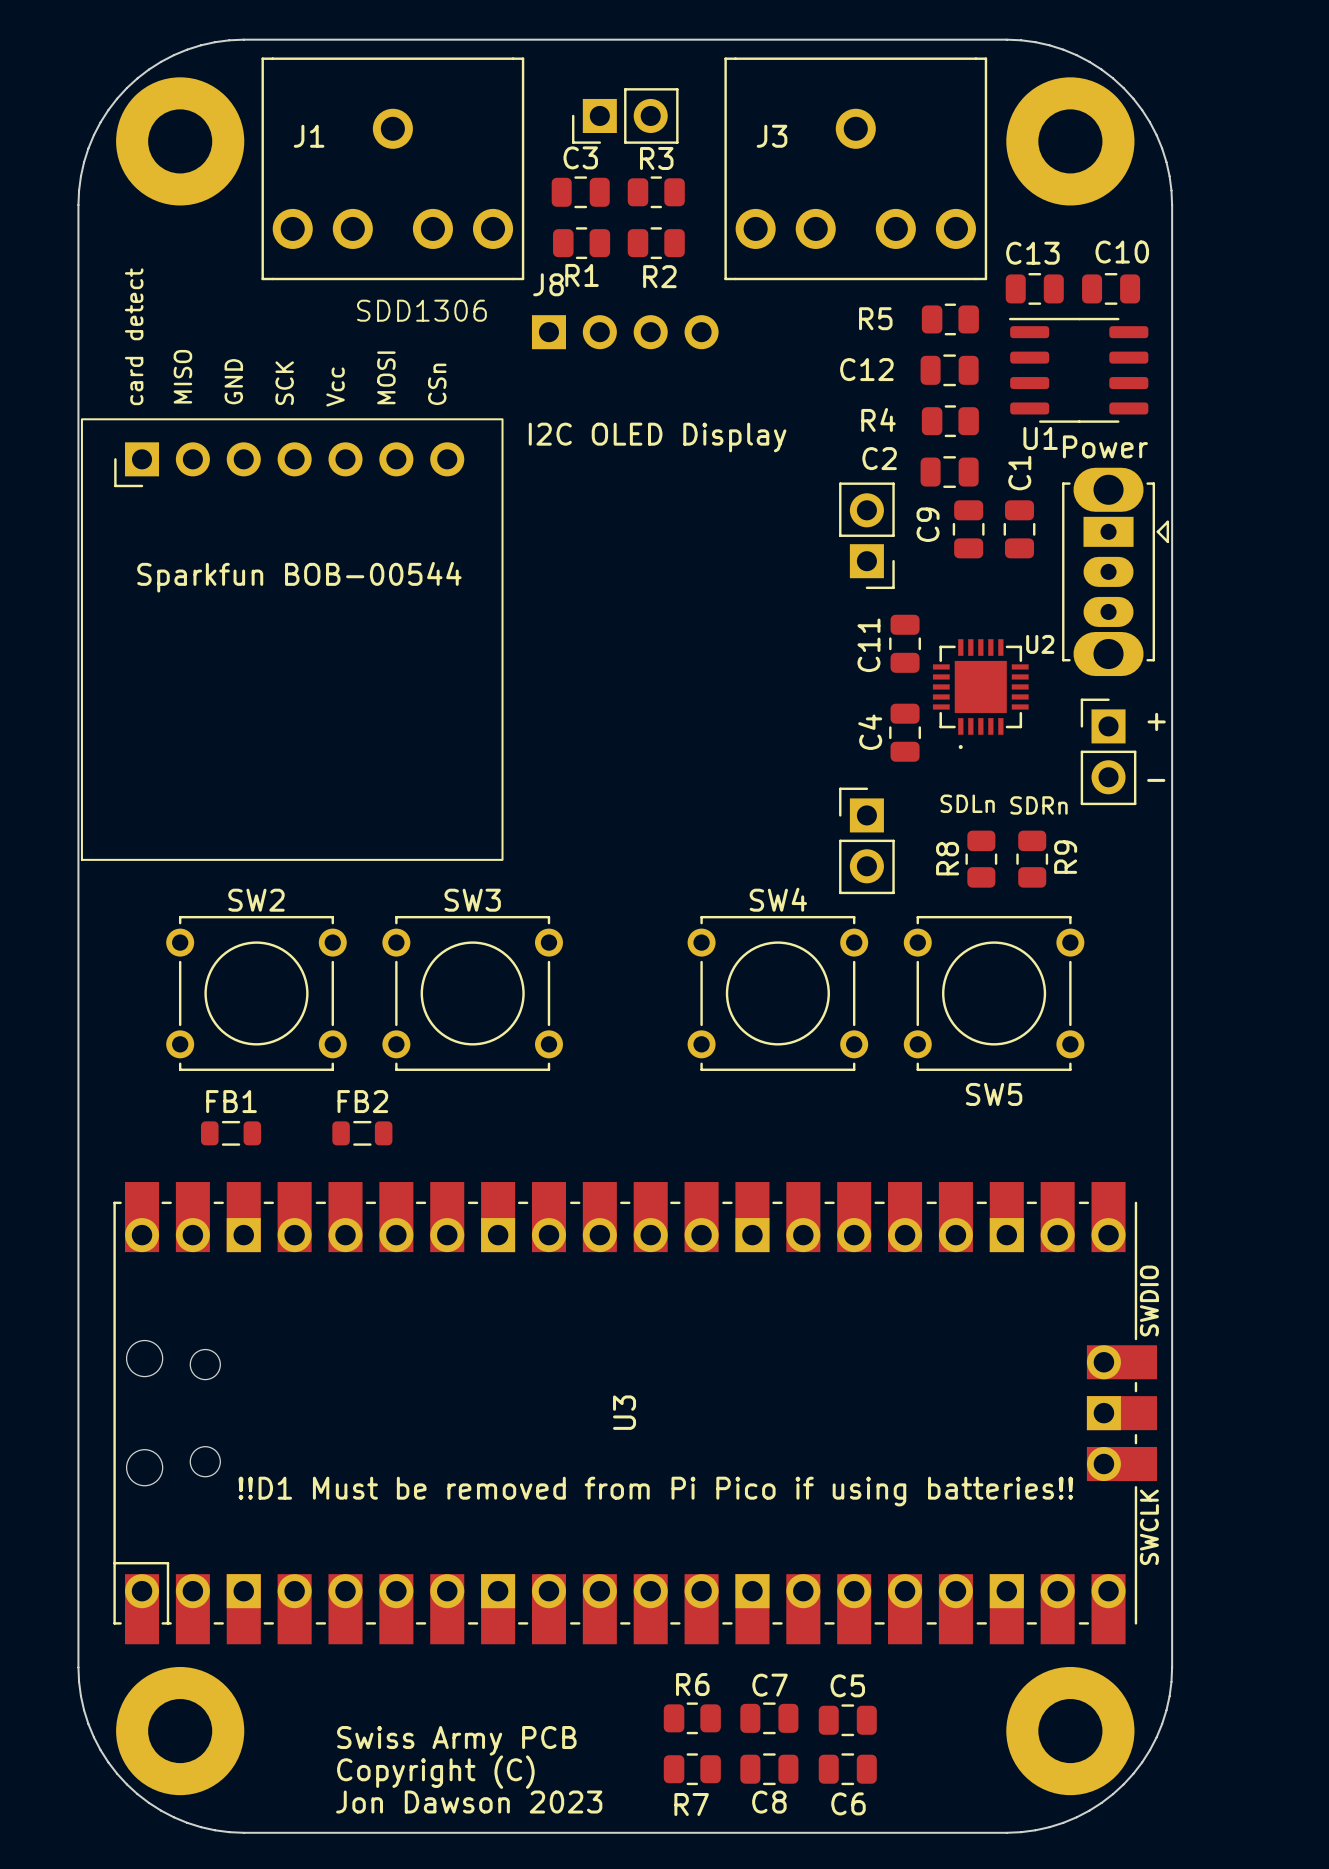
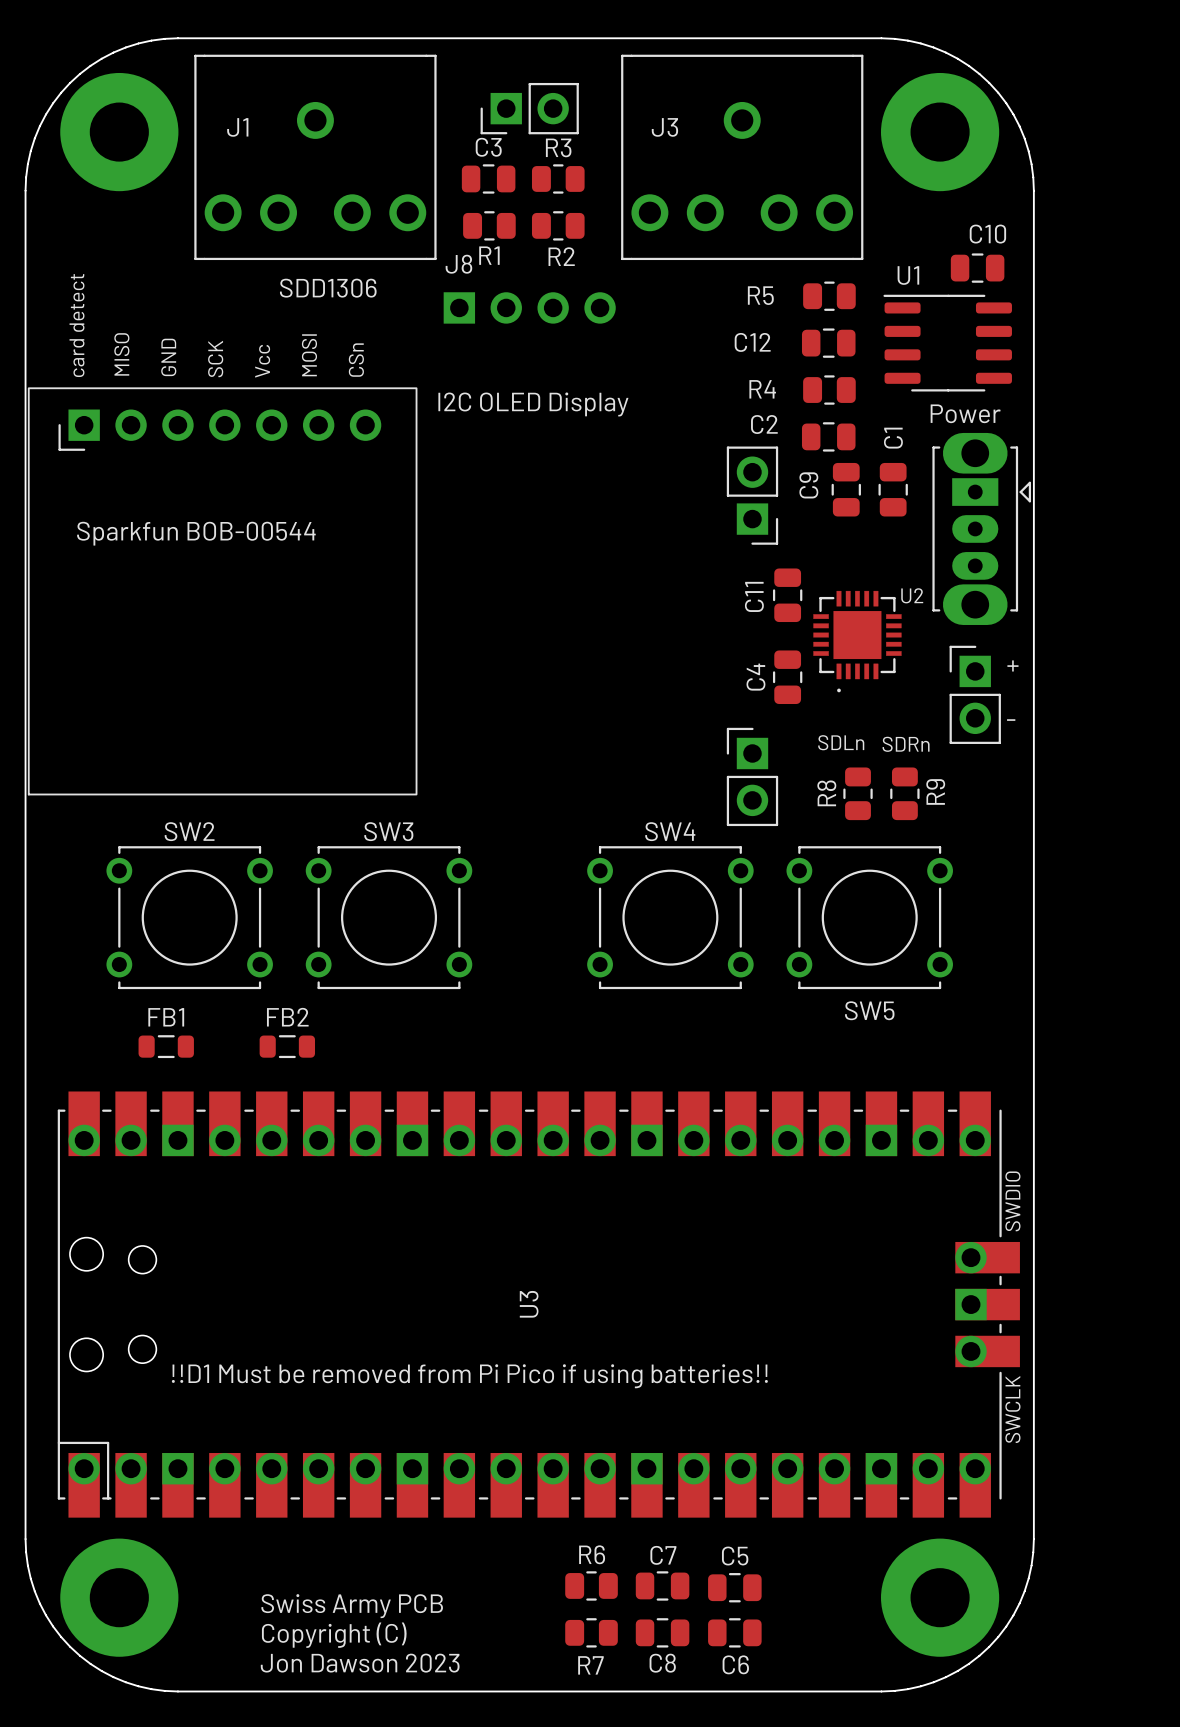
C13: (1034, 288) -> none
U1 name position: U1 (1040, 438) -> U1 (908, 275)

